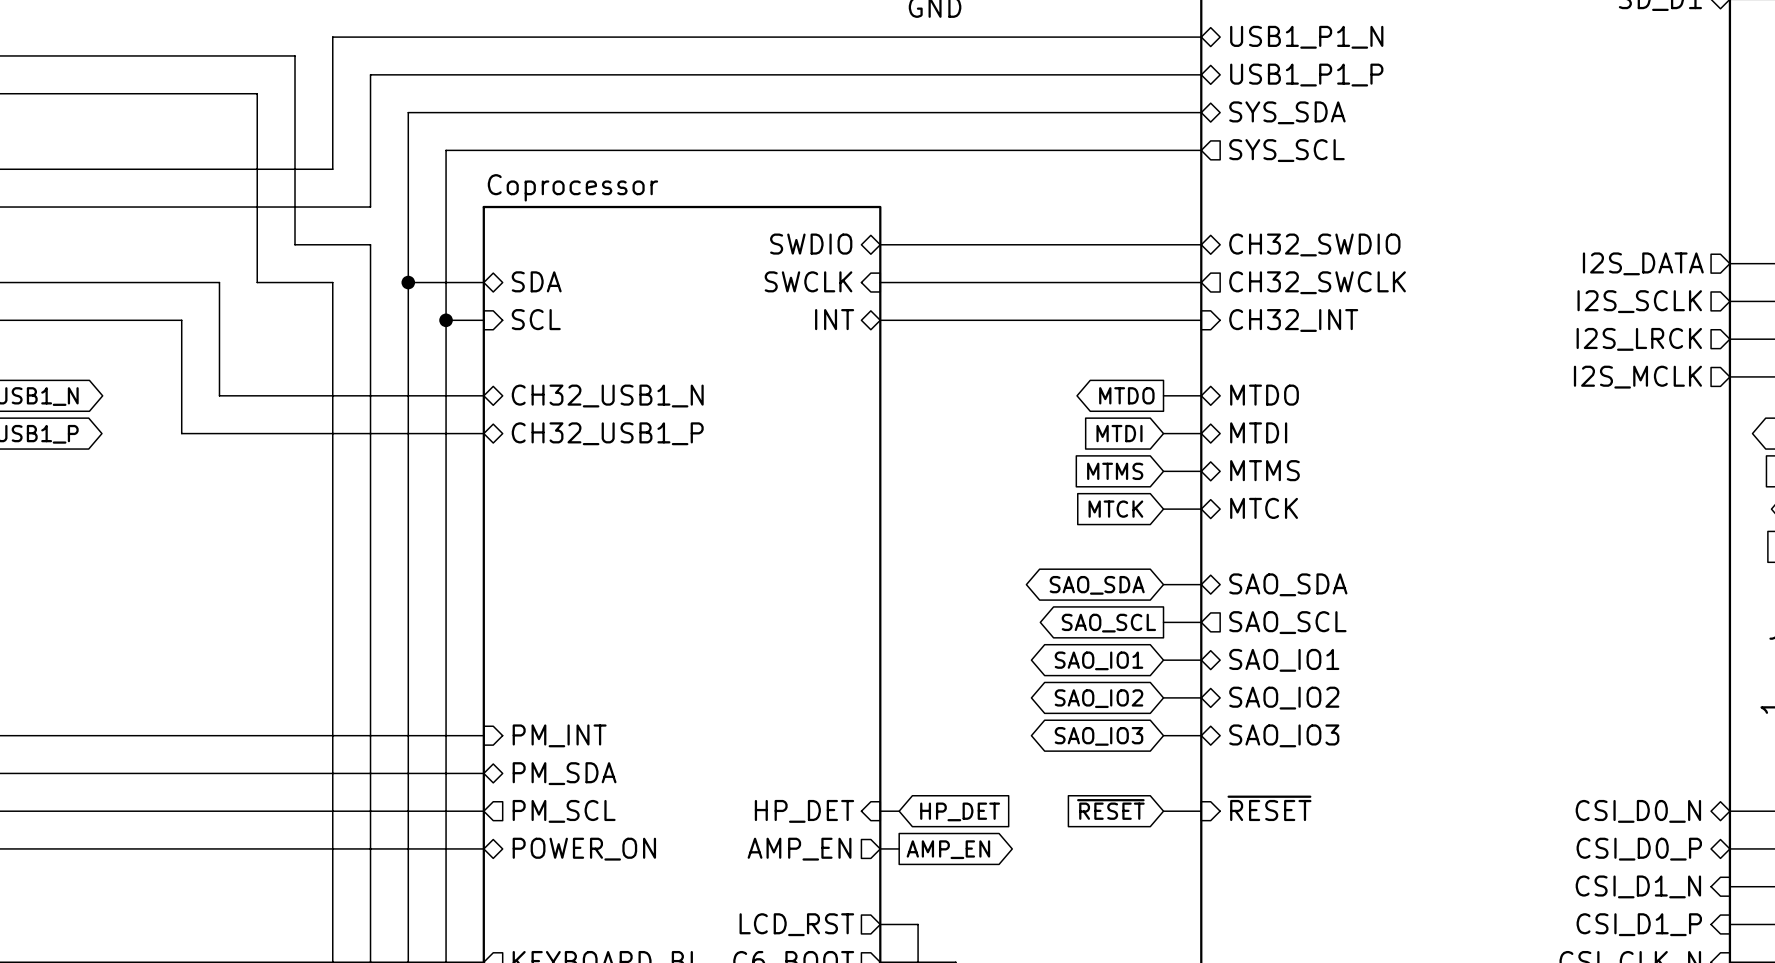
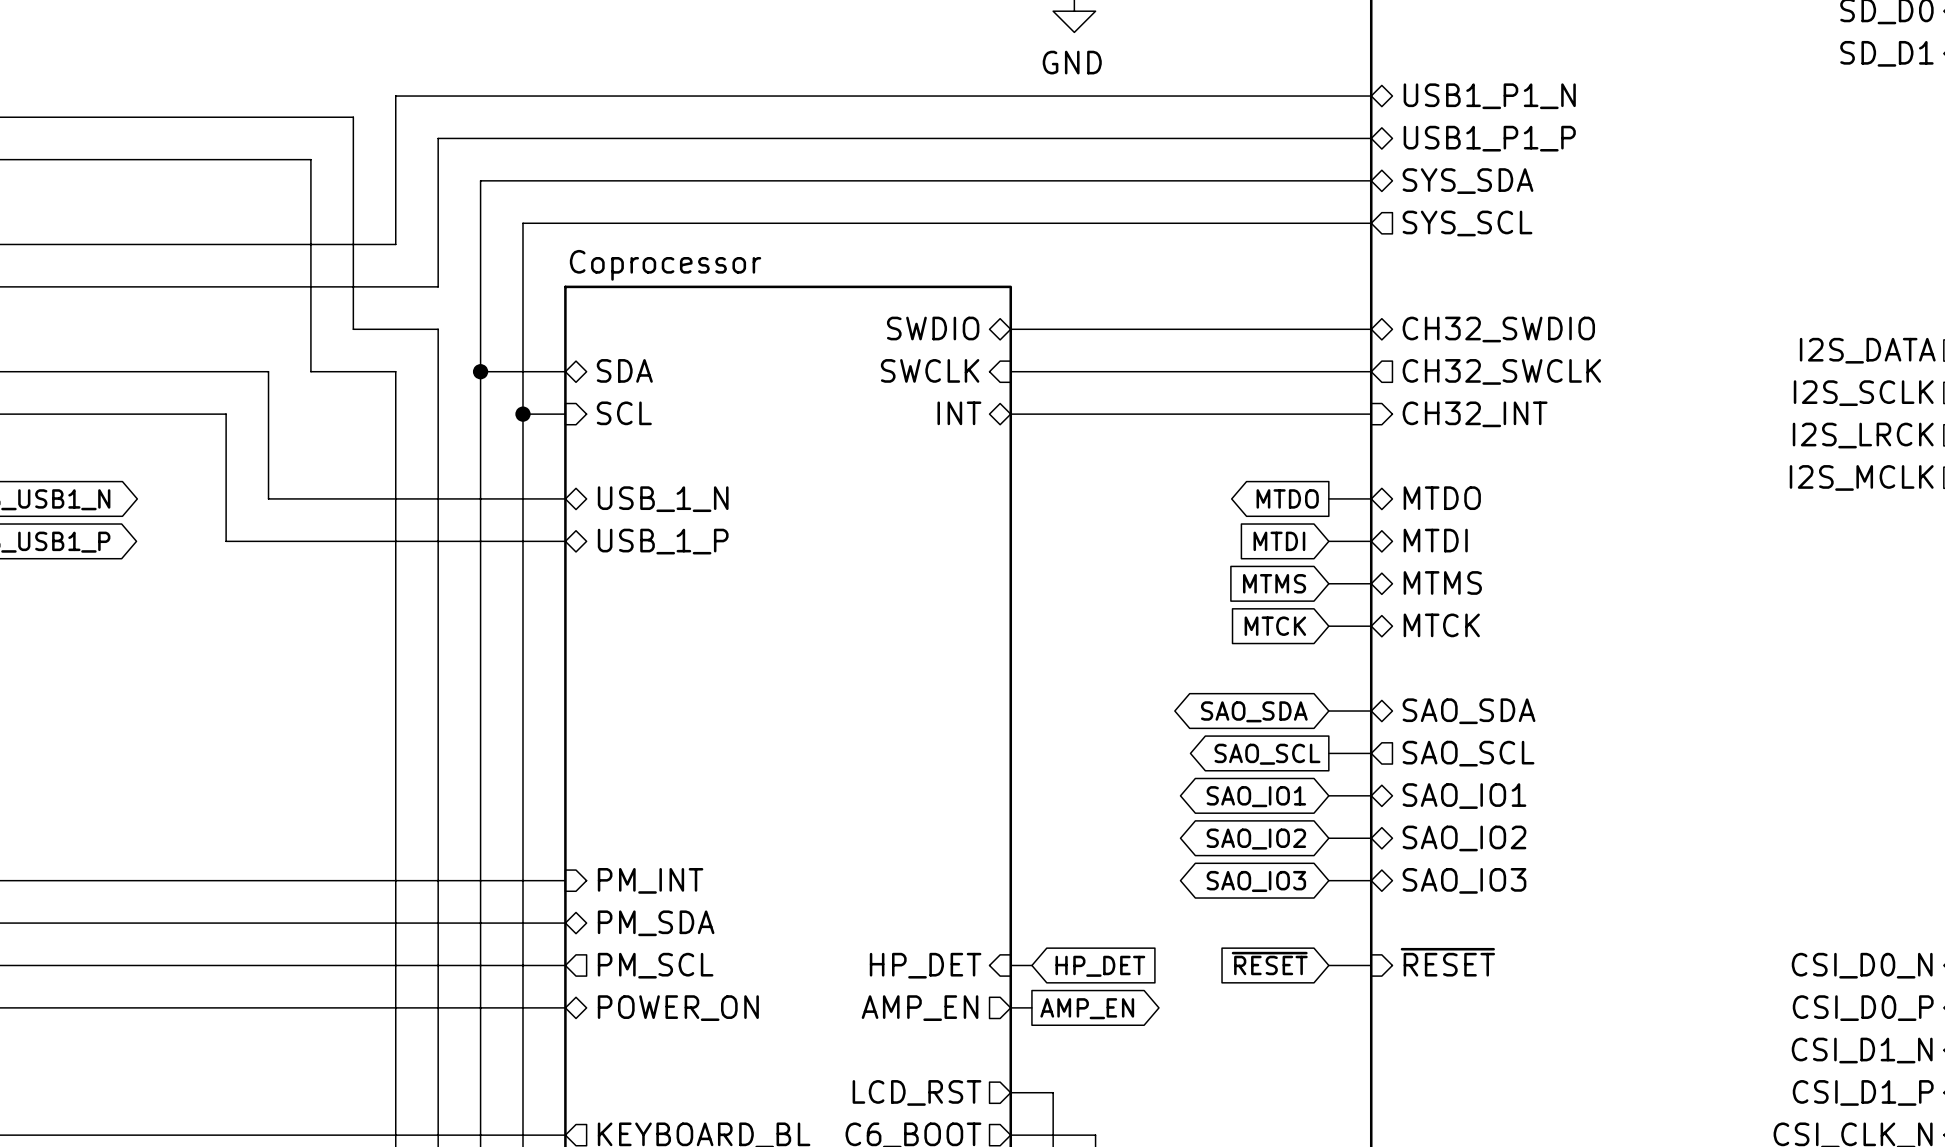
sheet pin: CH32_USB1_N (607, 396) -> USB_1_N (663, 499)
sheet pin: CH32_USB1_P (607, 433) -> USB_1_P (663, 541)

